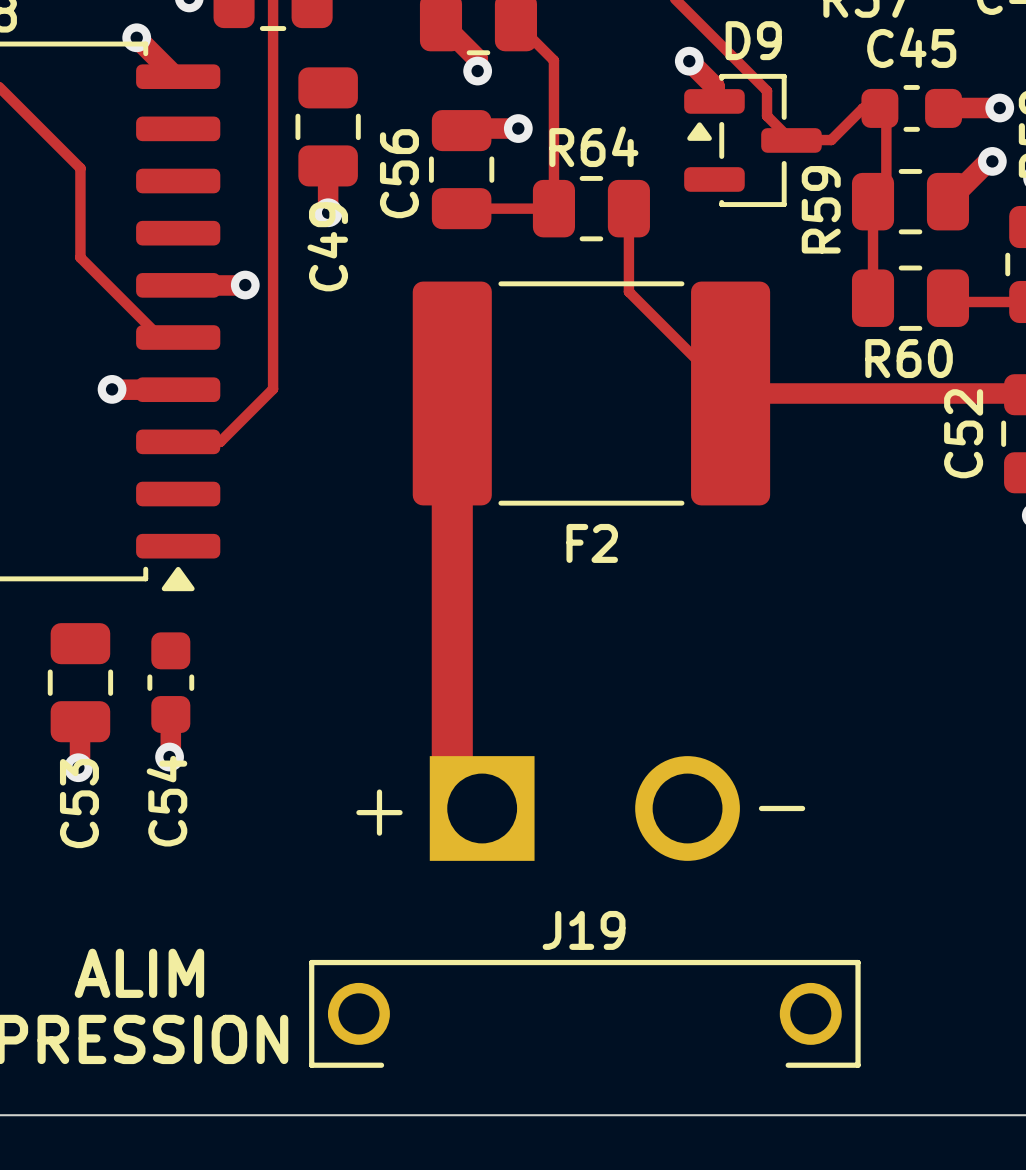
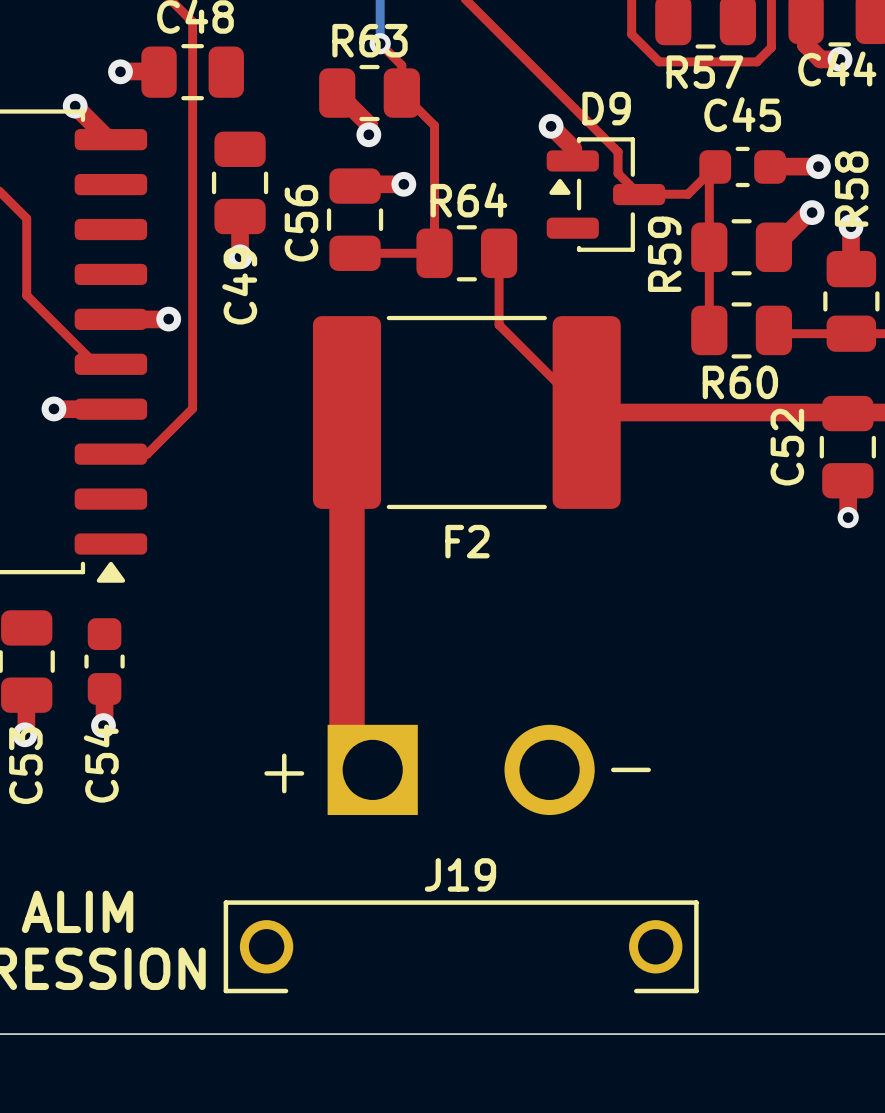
top track: none -> (715, 166) (688, 194) (673, 194)
top track: (831, 140) (862, 108) (879, 108) (886, 114) (886, 188) (873, 201) -> (709, 172) (709, 247)

